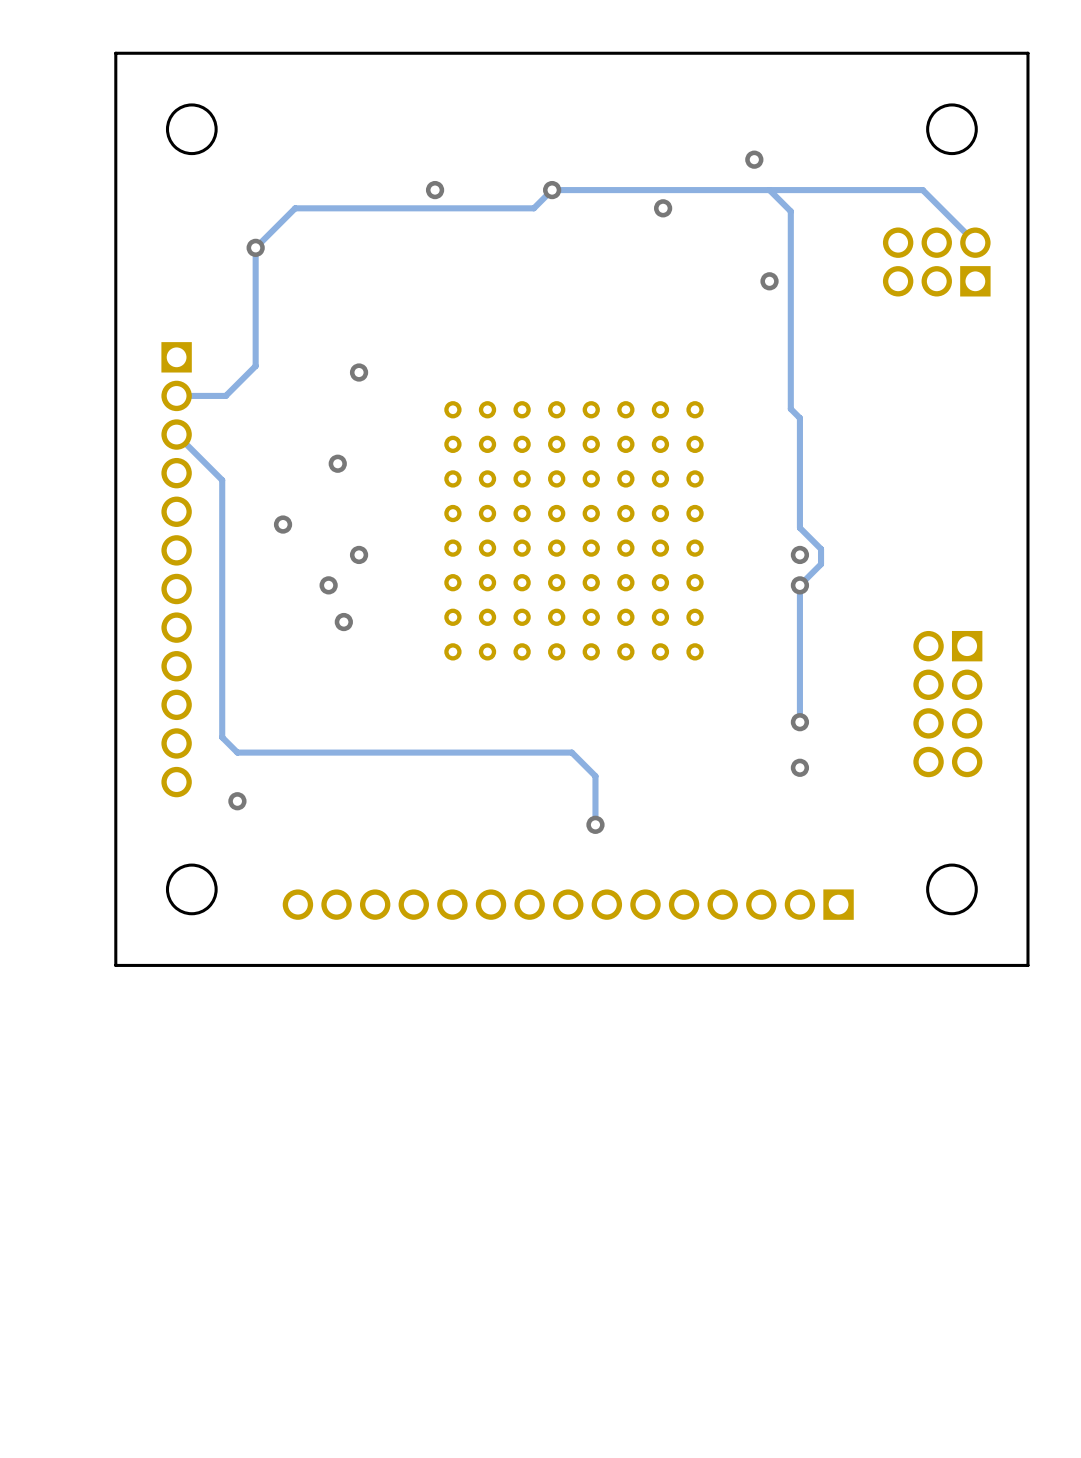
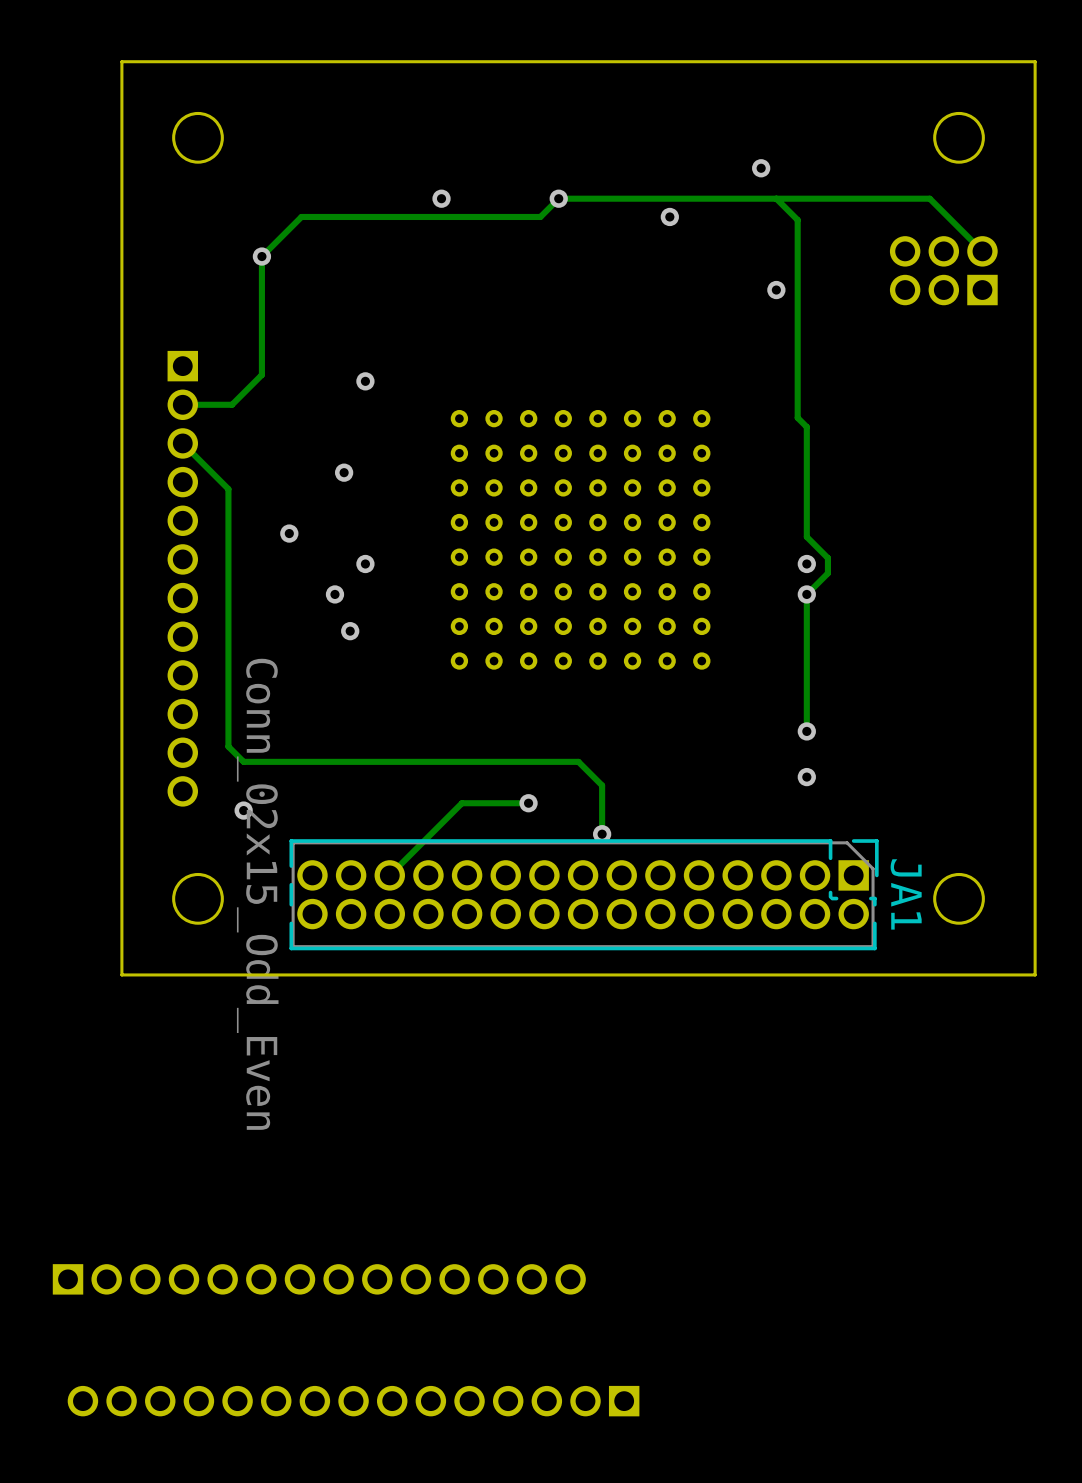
part: (947, 704) -> none
track: none -> (528, 803) (461, 803) (389, 875)
via: none -> (528, 803)
JA1: none -> Conn_02x15_Odd_Even (584, 894)
part position: (568, 904) -> (353, 1401)
part: none -> (319, 1279)

